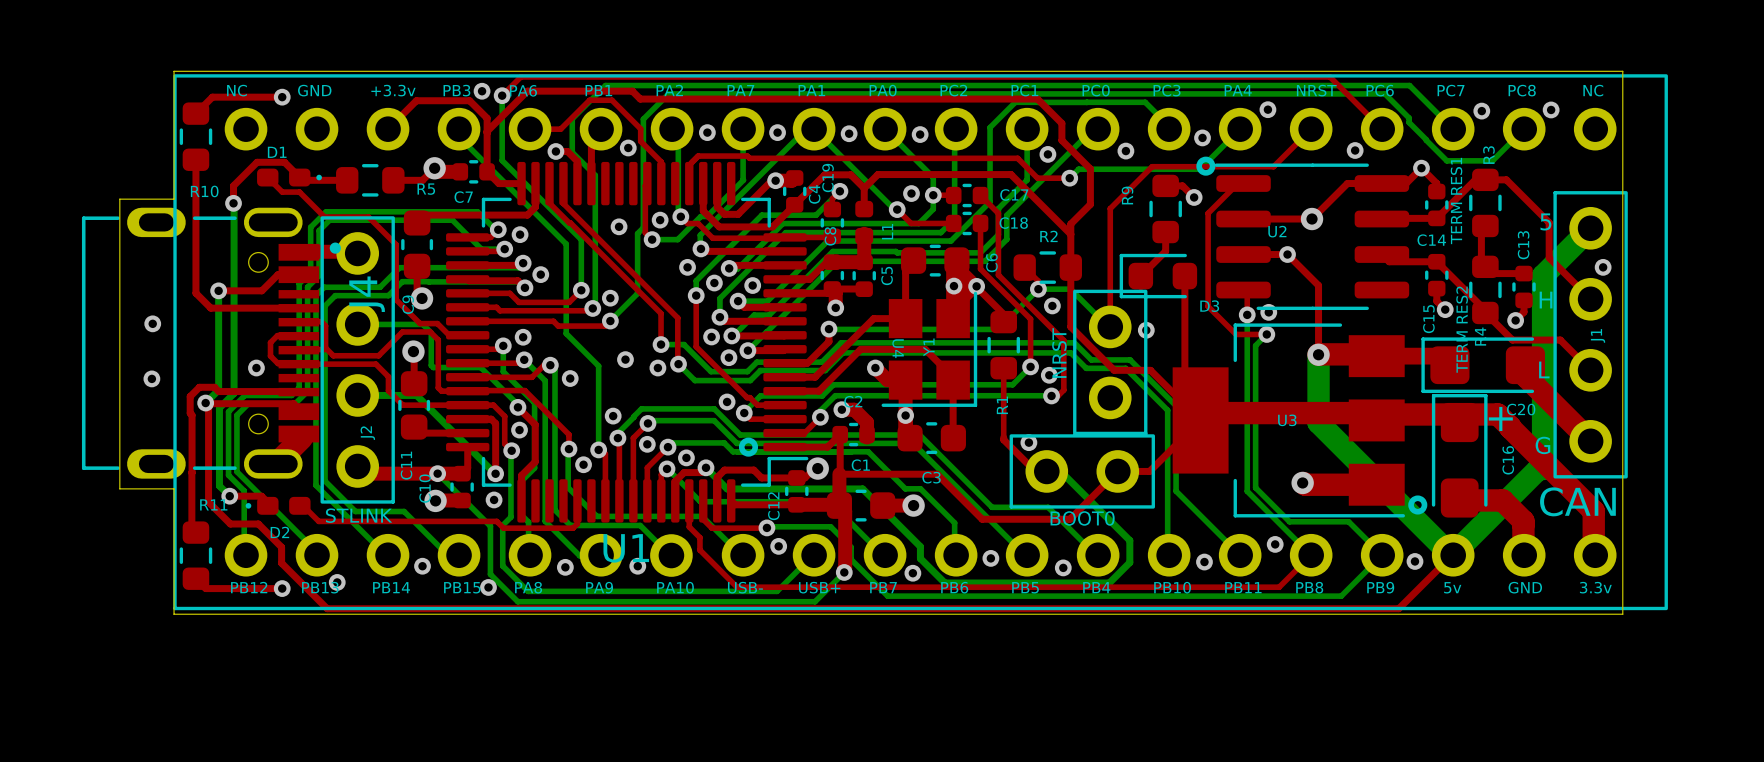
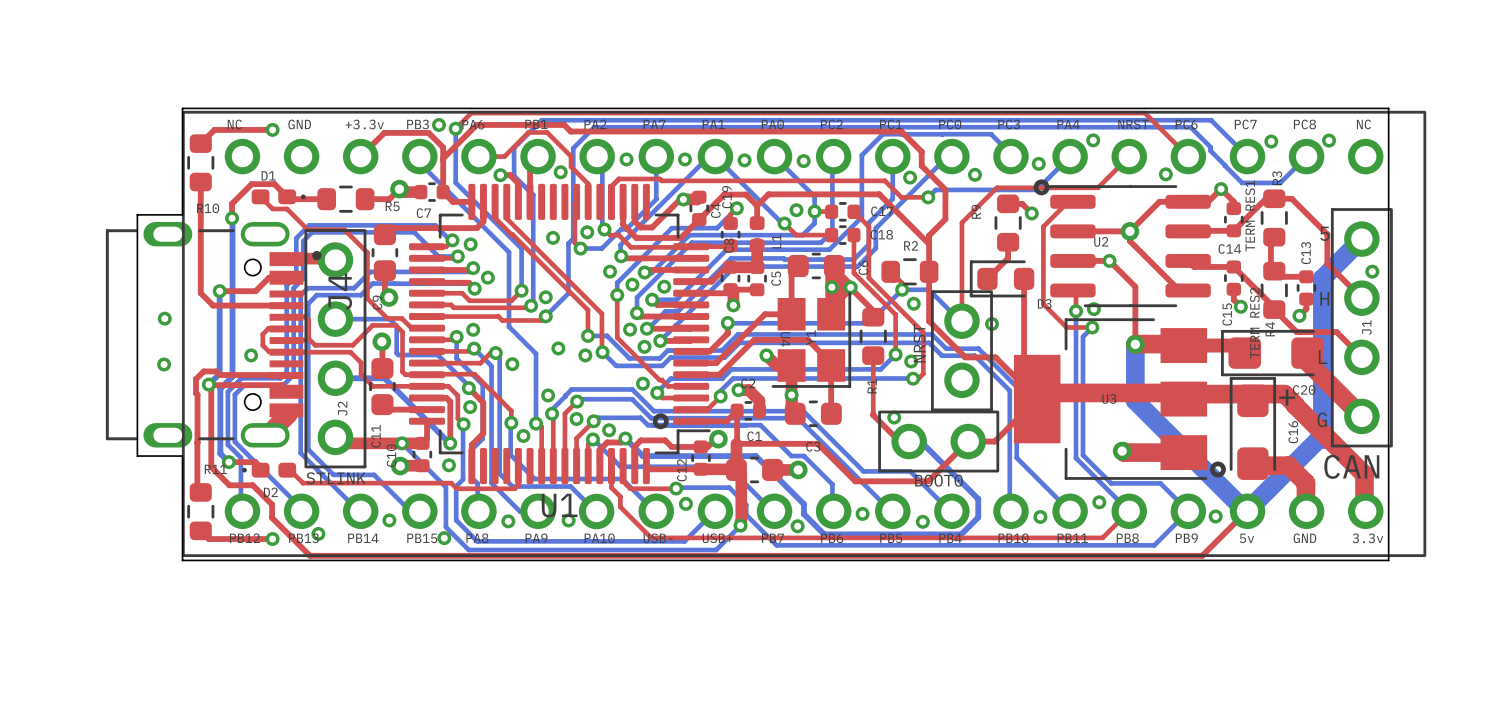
top track: none -> (1129, 231) (1129, 241) (1179, 290)

